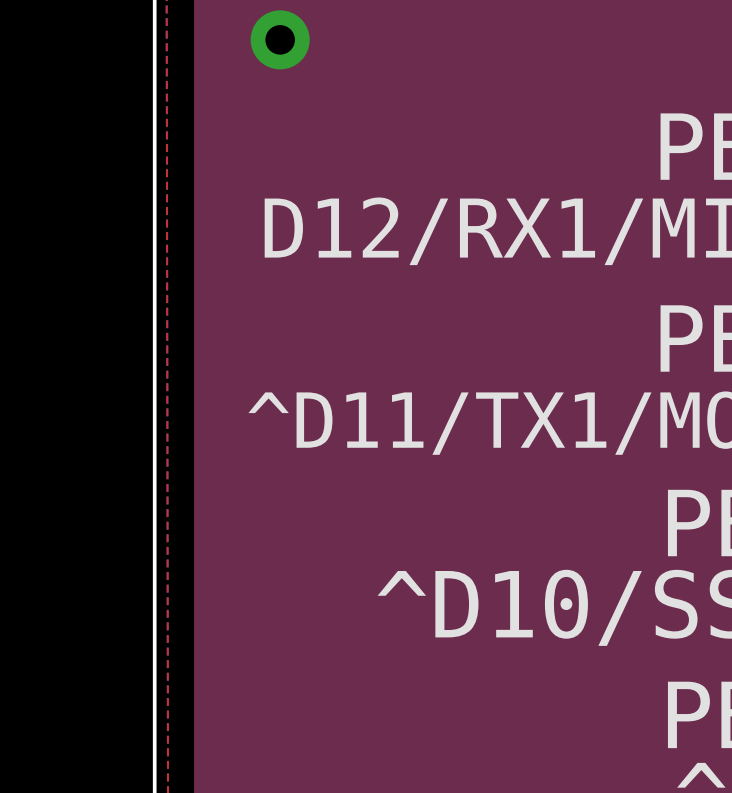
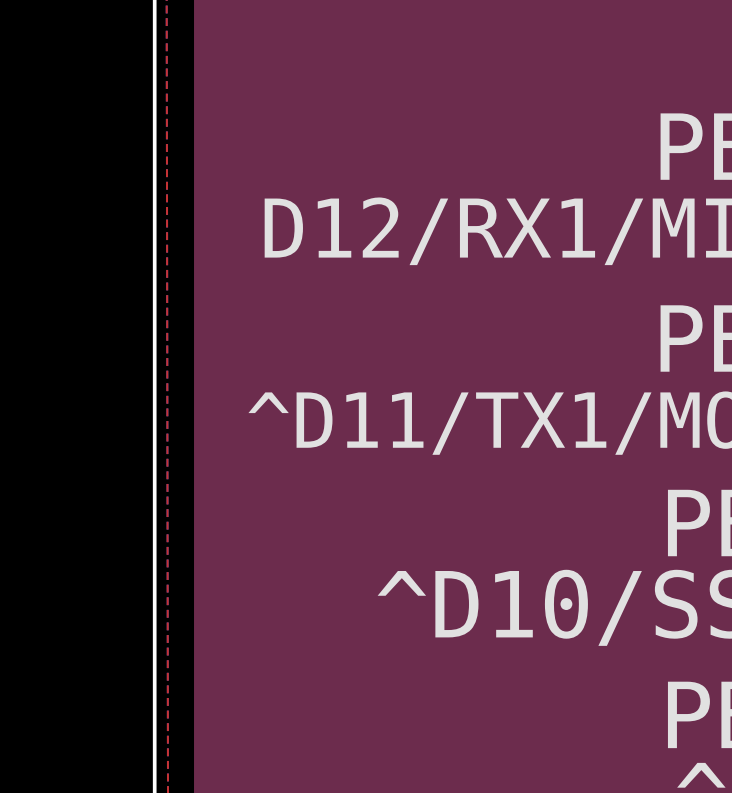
via: (280, 39) -> none

